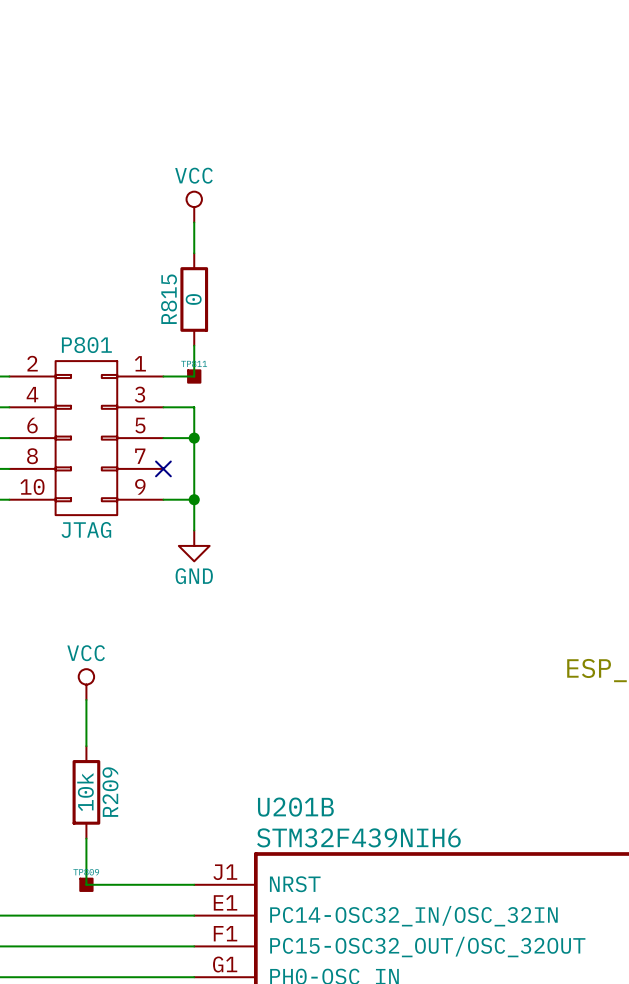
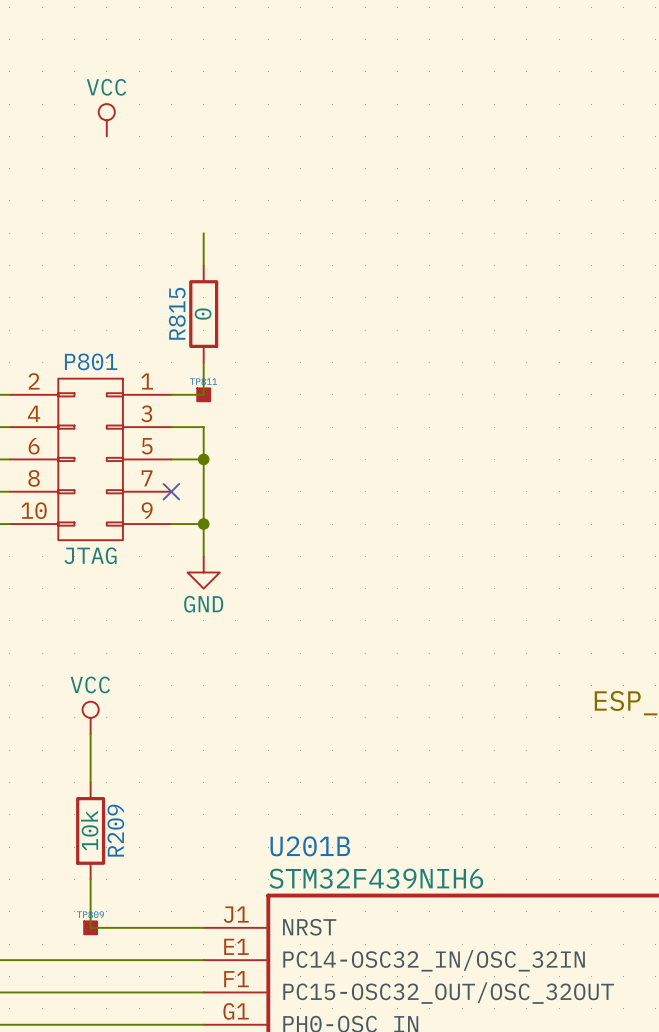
power symbol position: VCC (194, 207) -> VCC (106, 120)

